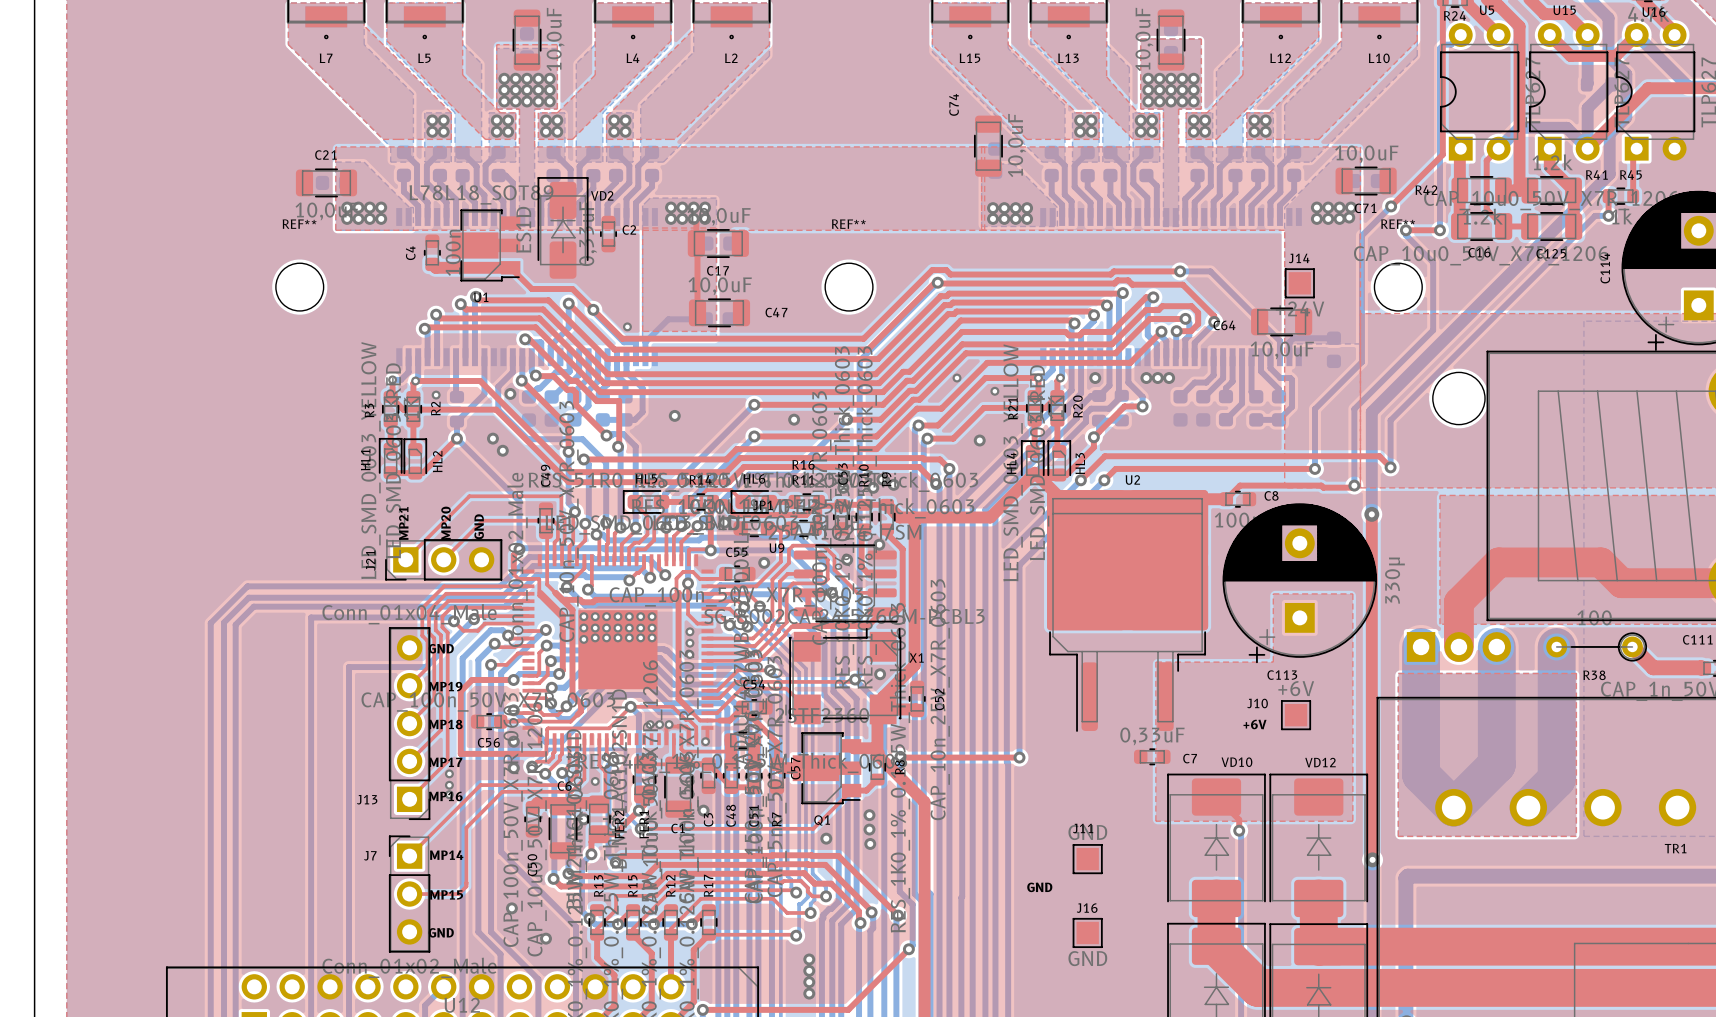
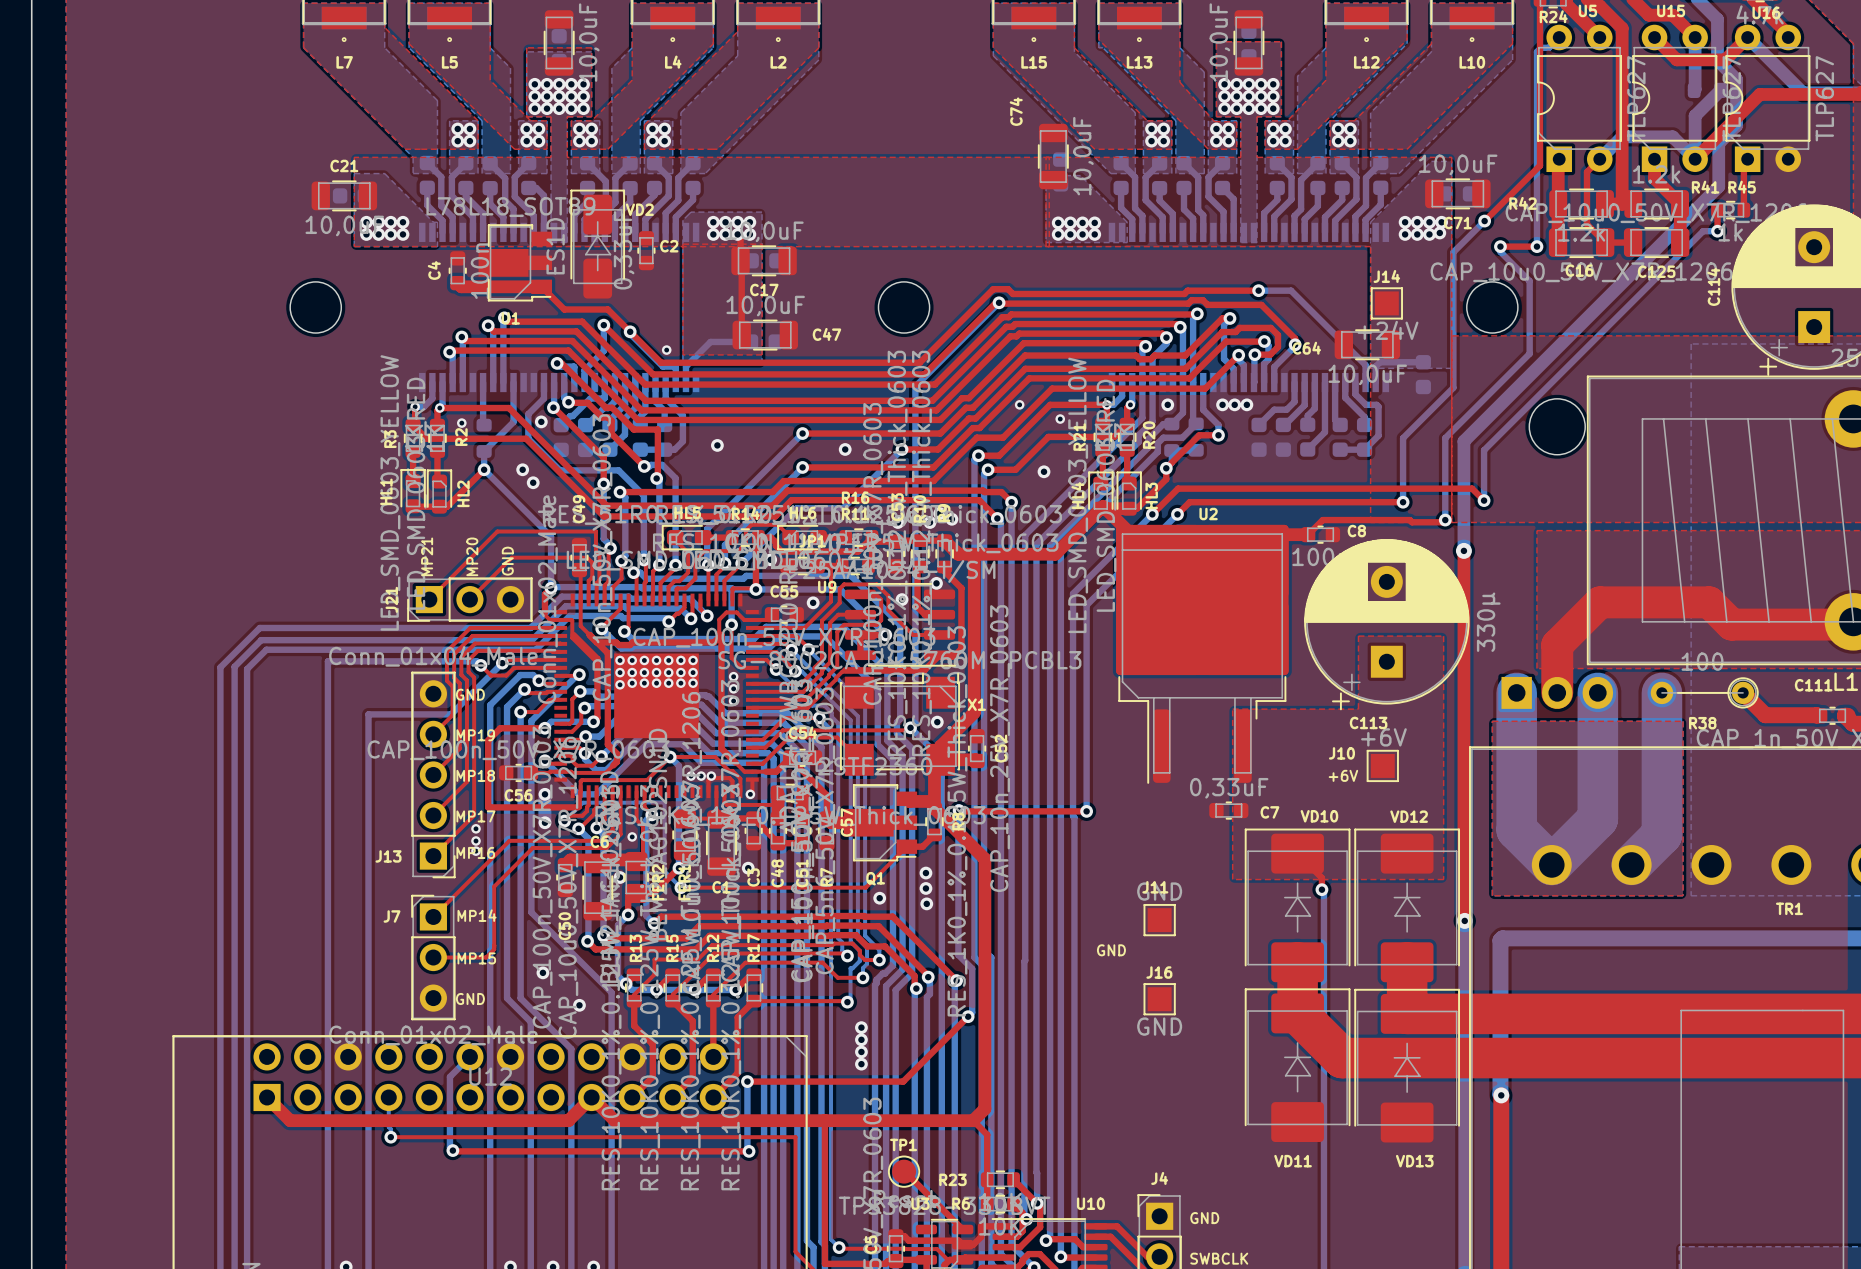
REF** name: REF** (299, 224) -> none
REF** name: REF** (848, 224) -> none
REF** name: REF** (1398, 224) -> none

